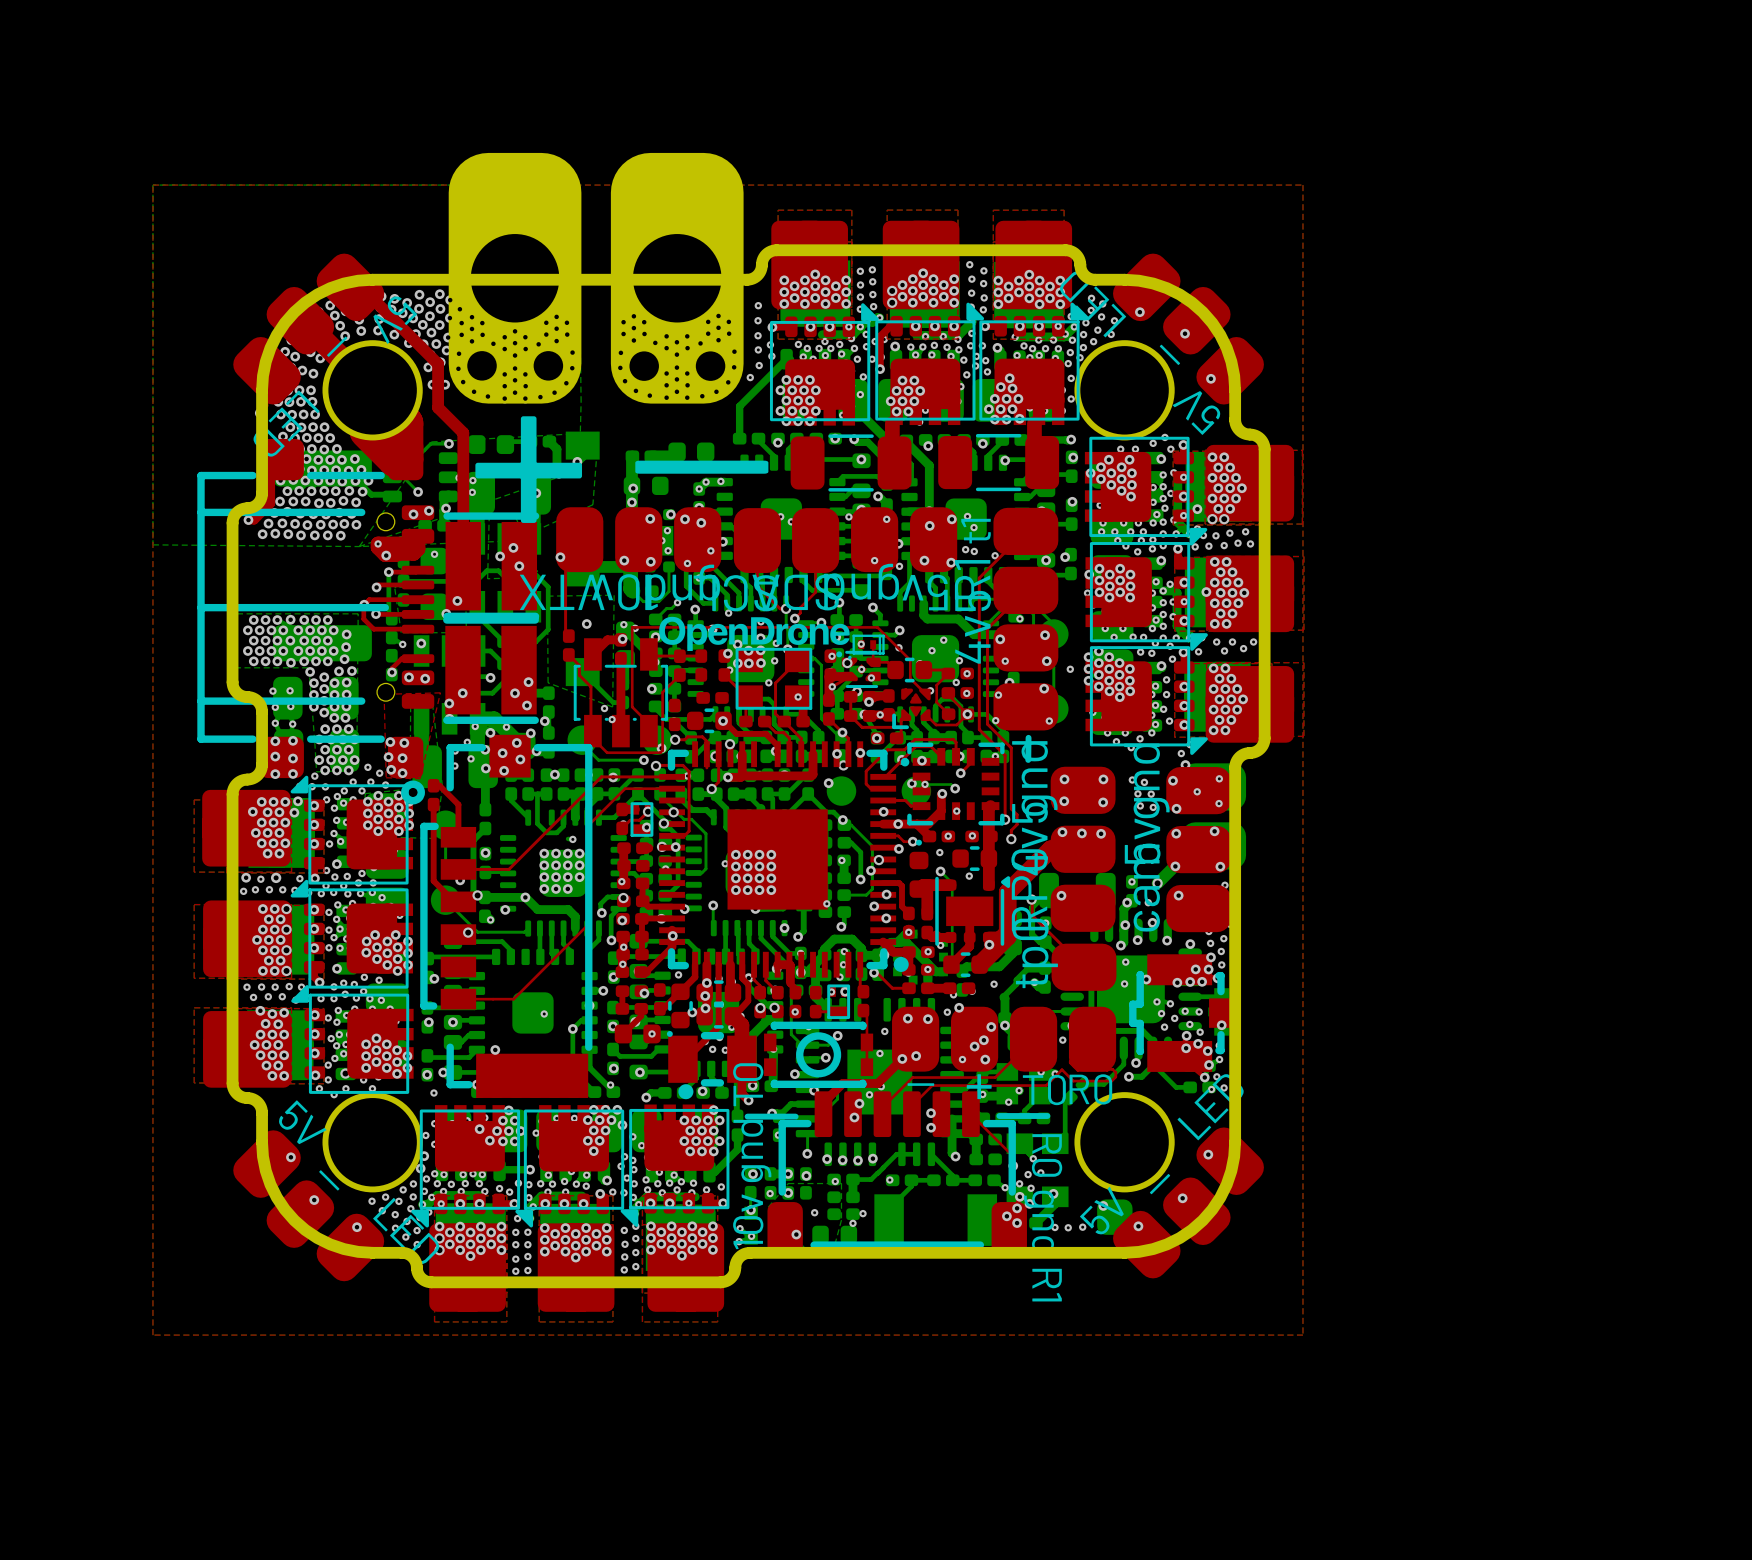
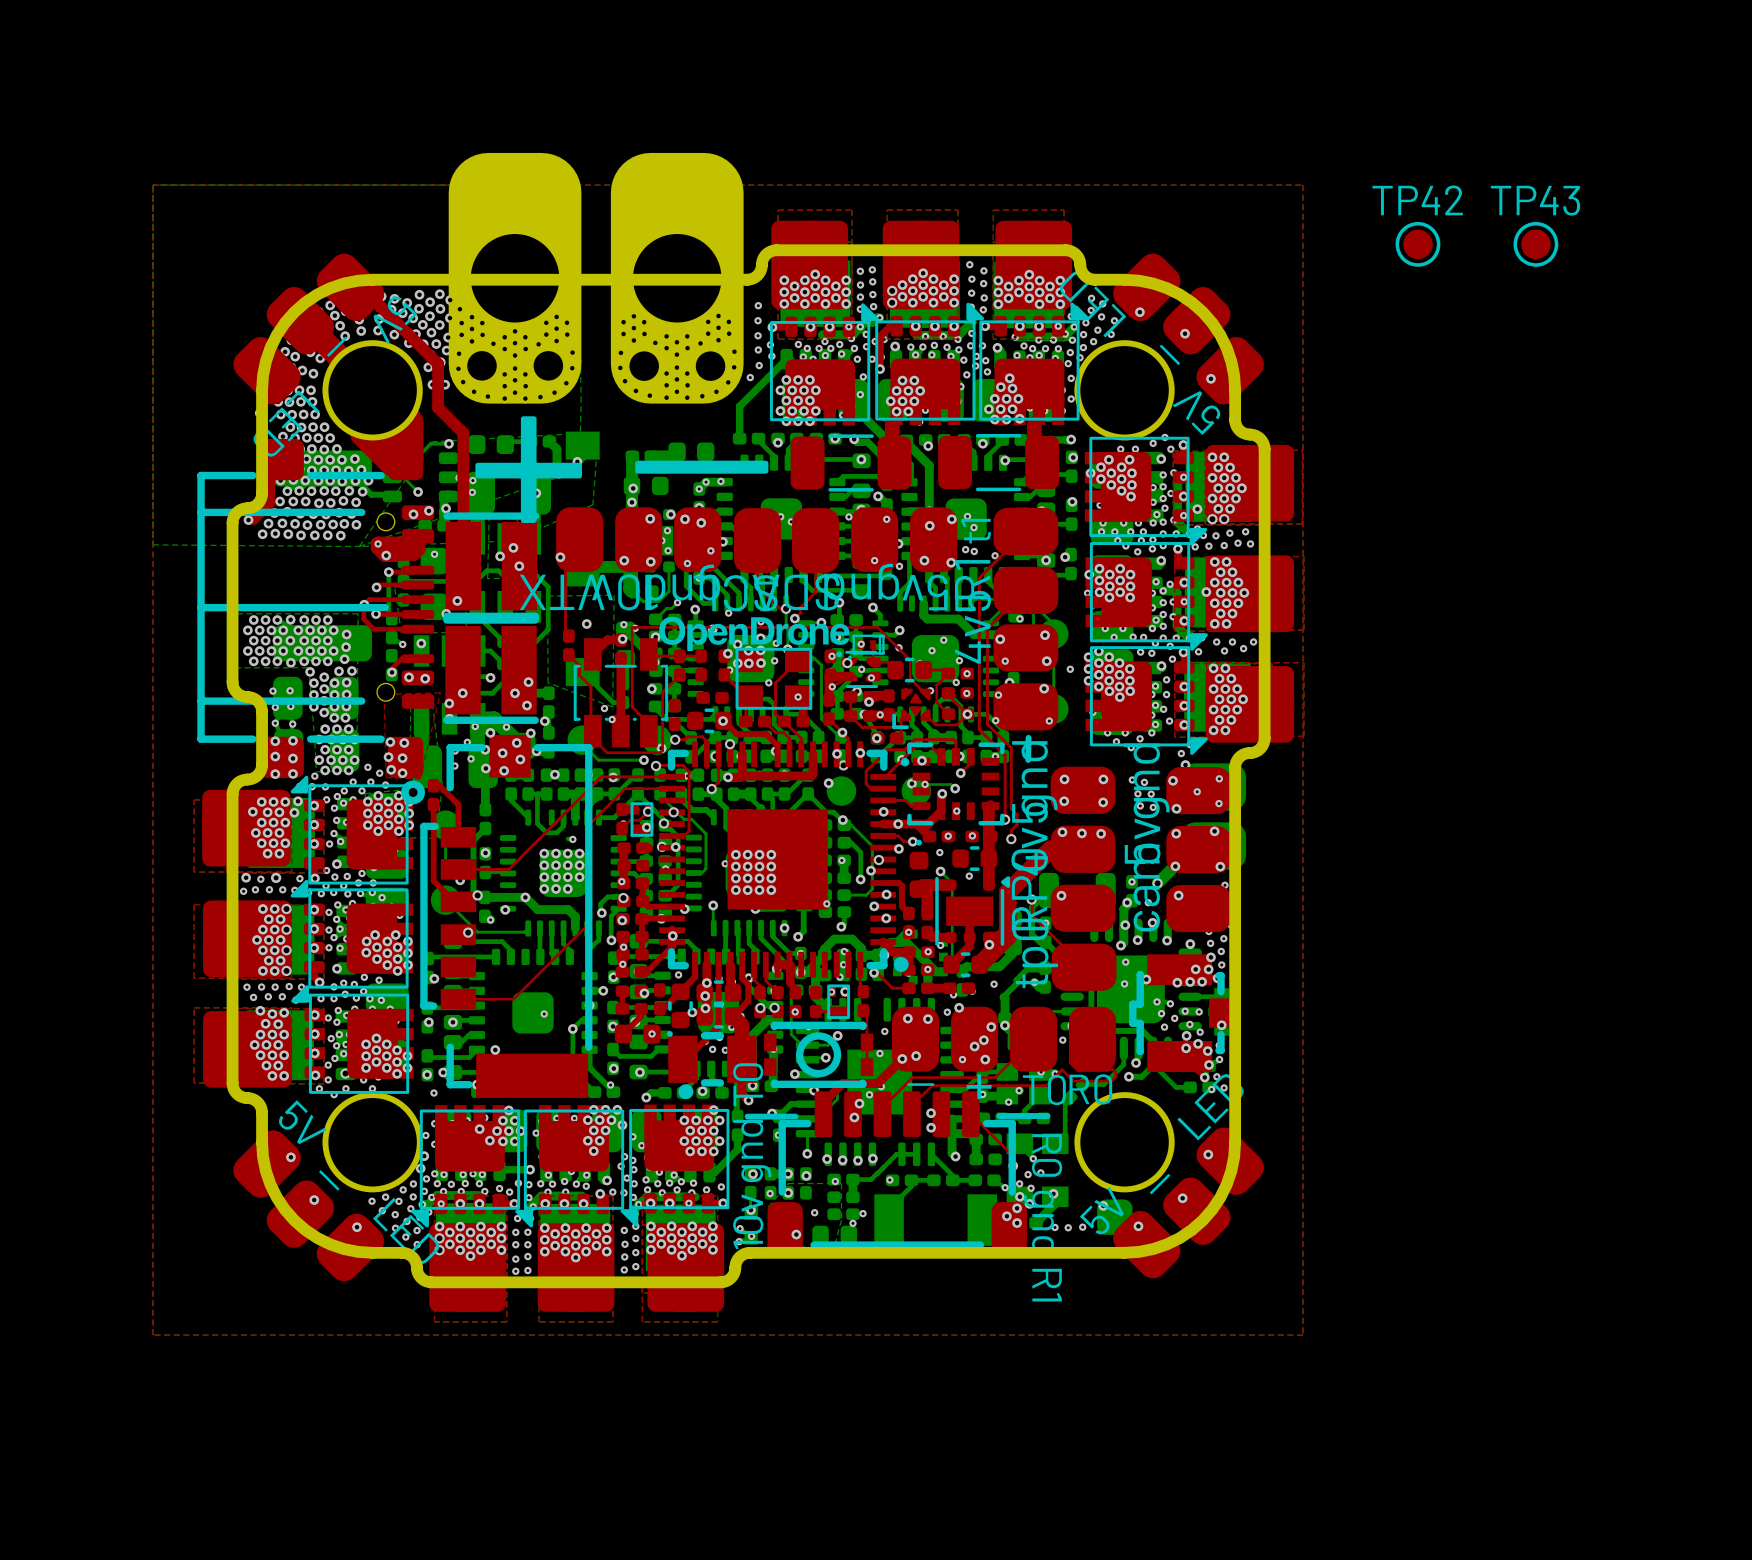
TP42: none -> (1417, 244)
TP43: none -> (1535, 244)

